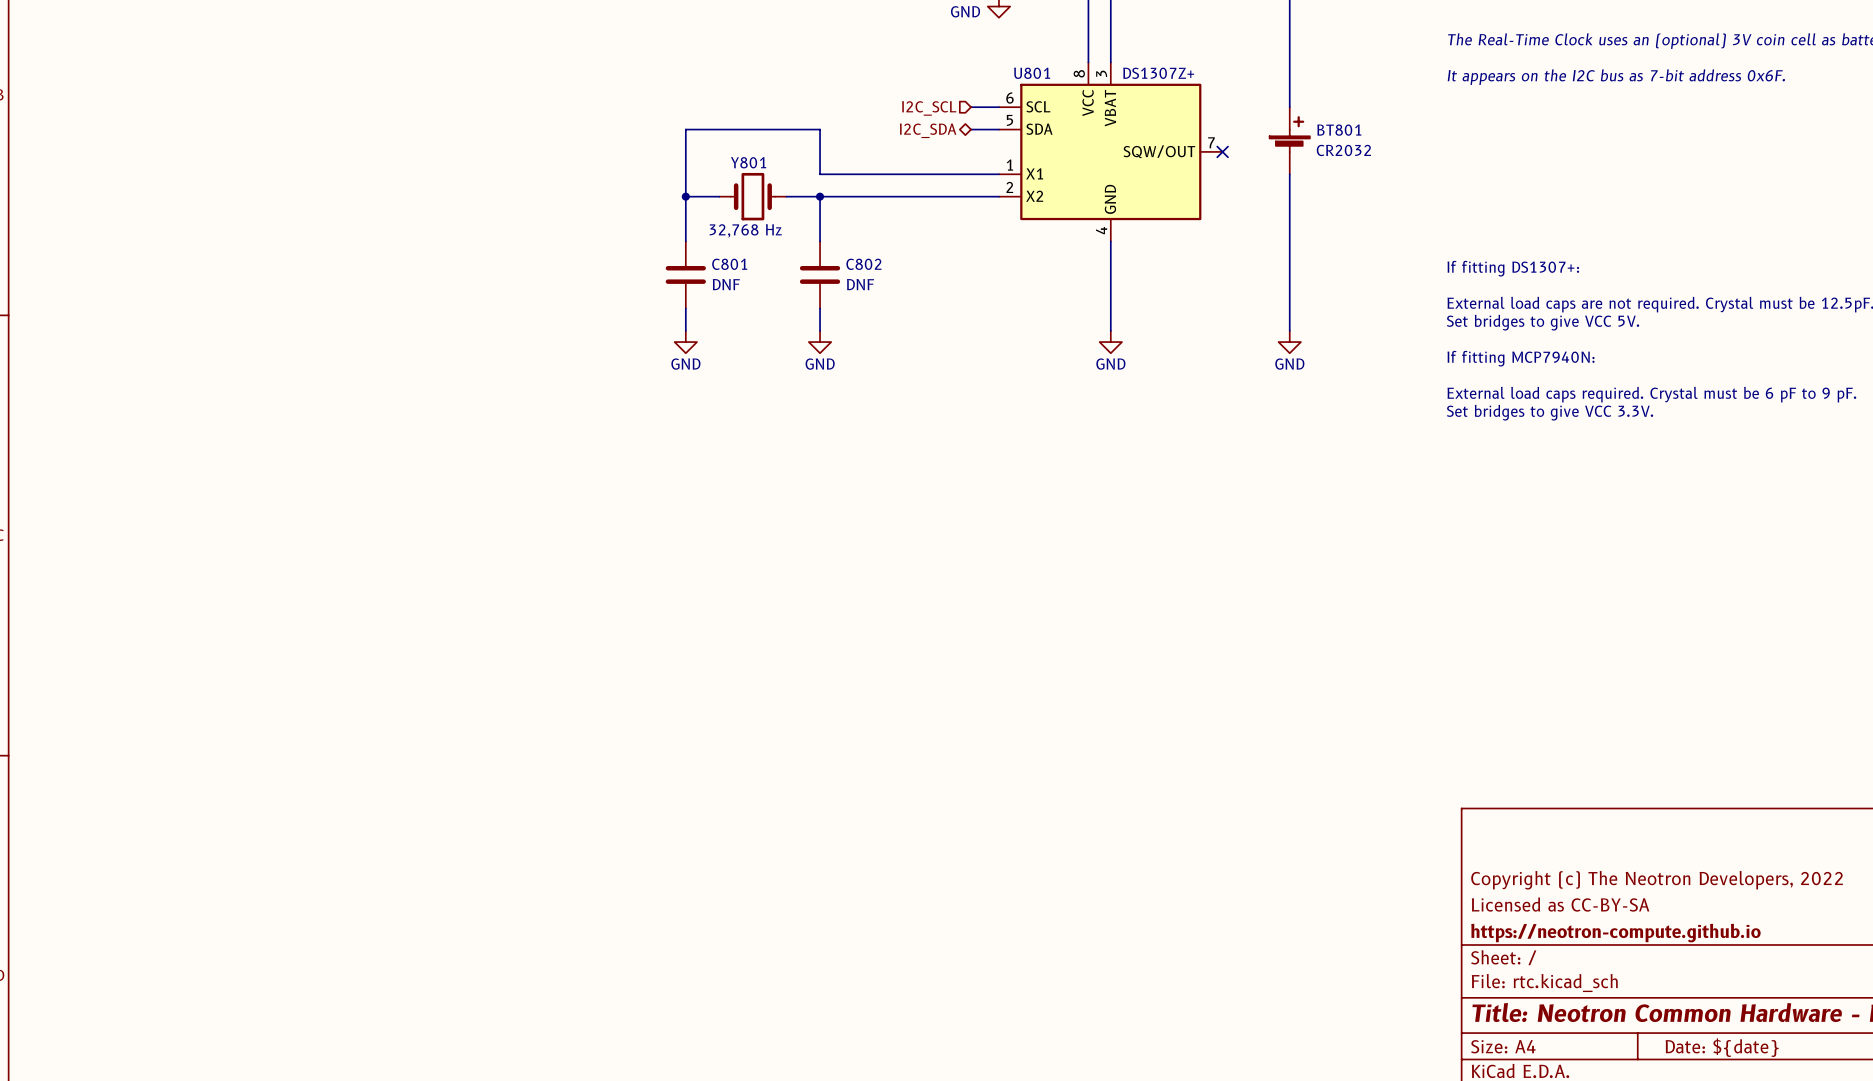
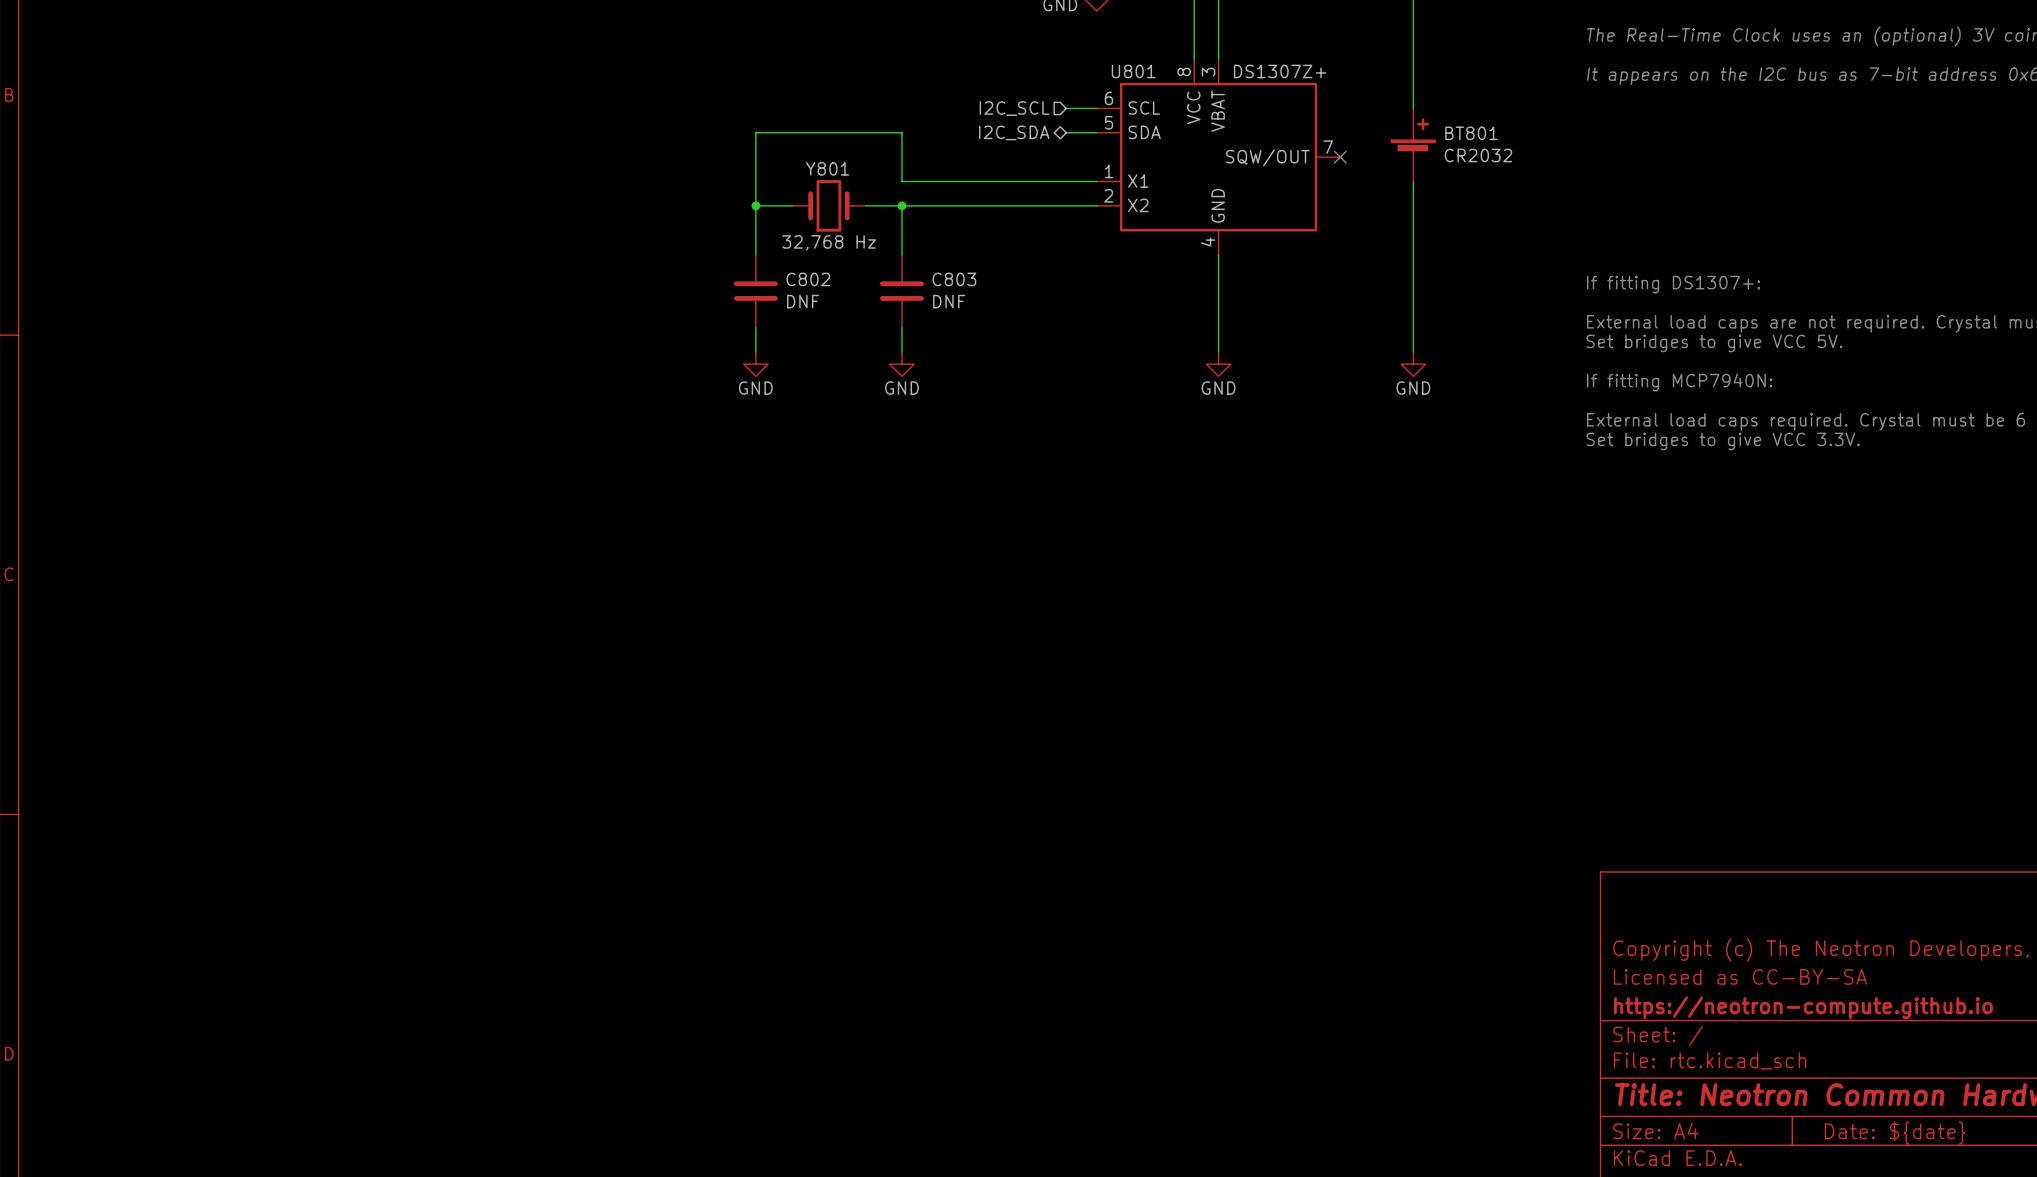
C801 name: C801 (729, 264) -> C802 (808, 279)
C802 name: C802 (863, 264) -> C803 (954, 279)

